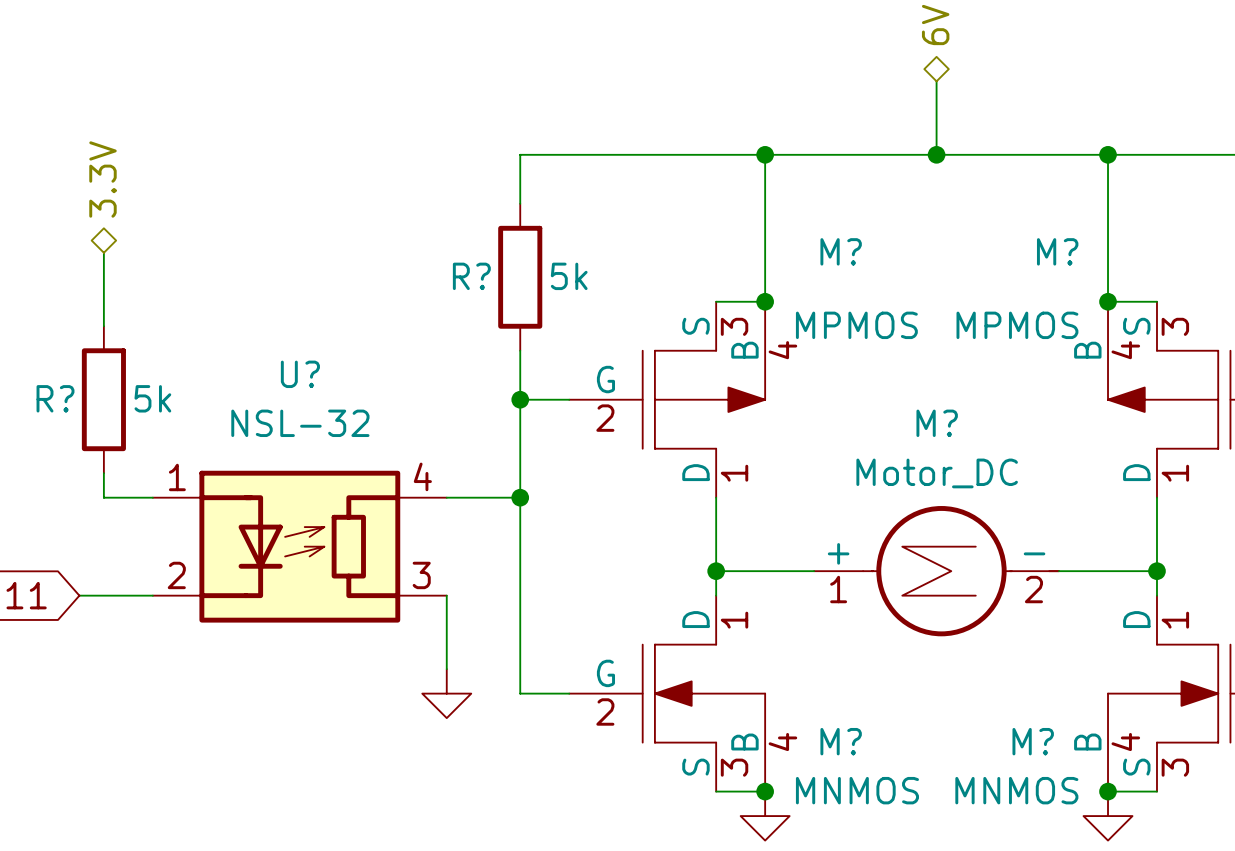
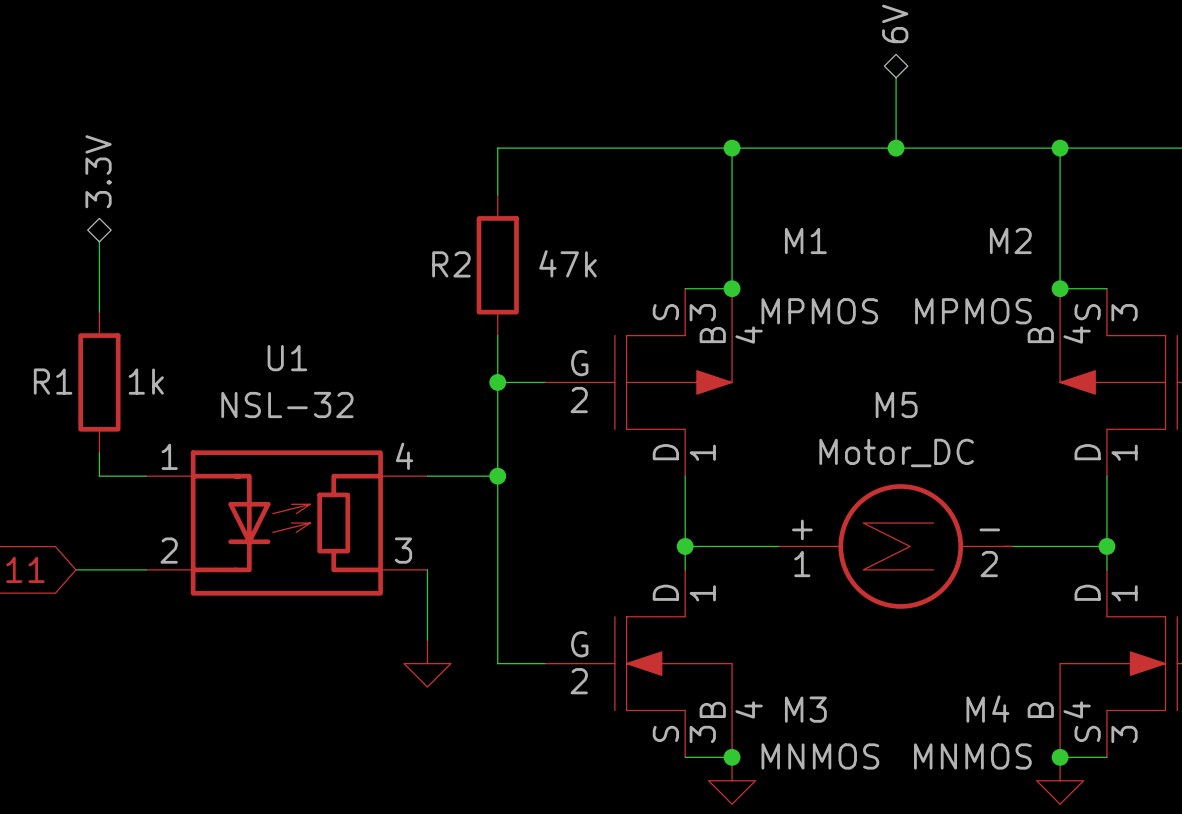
M? name: M? (841, 251) -> M1 (805, 240)
M? name: M? (1057, 251) -> M2 (1010, 240)
R? name: R? (471, 276) -> R2 (451, 264)
R? value: 5k (569, 276) -> 47k (568, 263)
U? name: U? (300, 374) -> U1 (287, 358)
R? name: R? (55, 398) -> R1 (53, 381)
R? value: 5k (152, 398) -> 1k (146, 381)
M? name: M? (937, 423) -> M5 (896, 405)
M? name: M? (841, 741) -> M3 (805, 709)
M? name: M? (1033, 741) -> M4 (987, 709)

